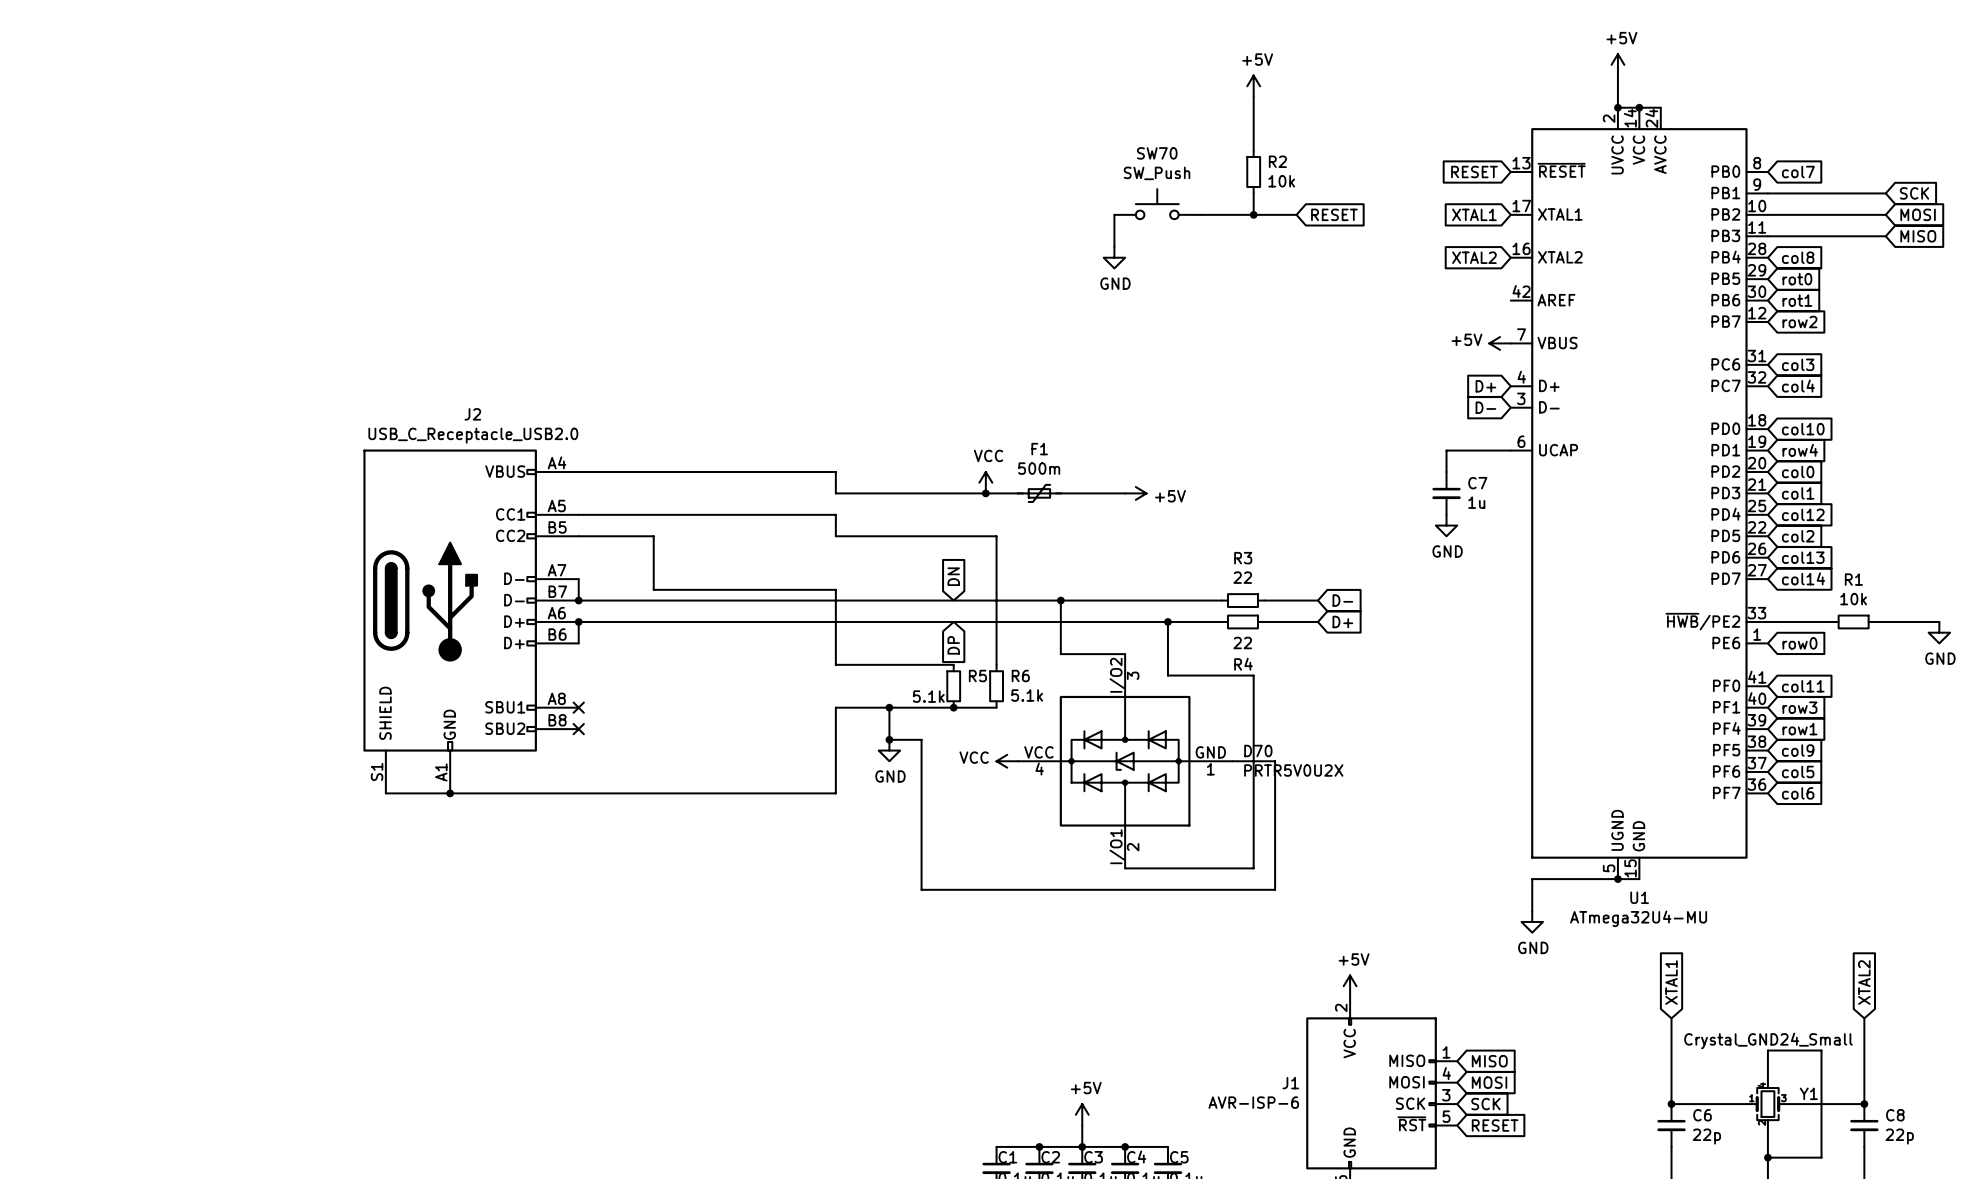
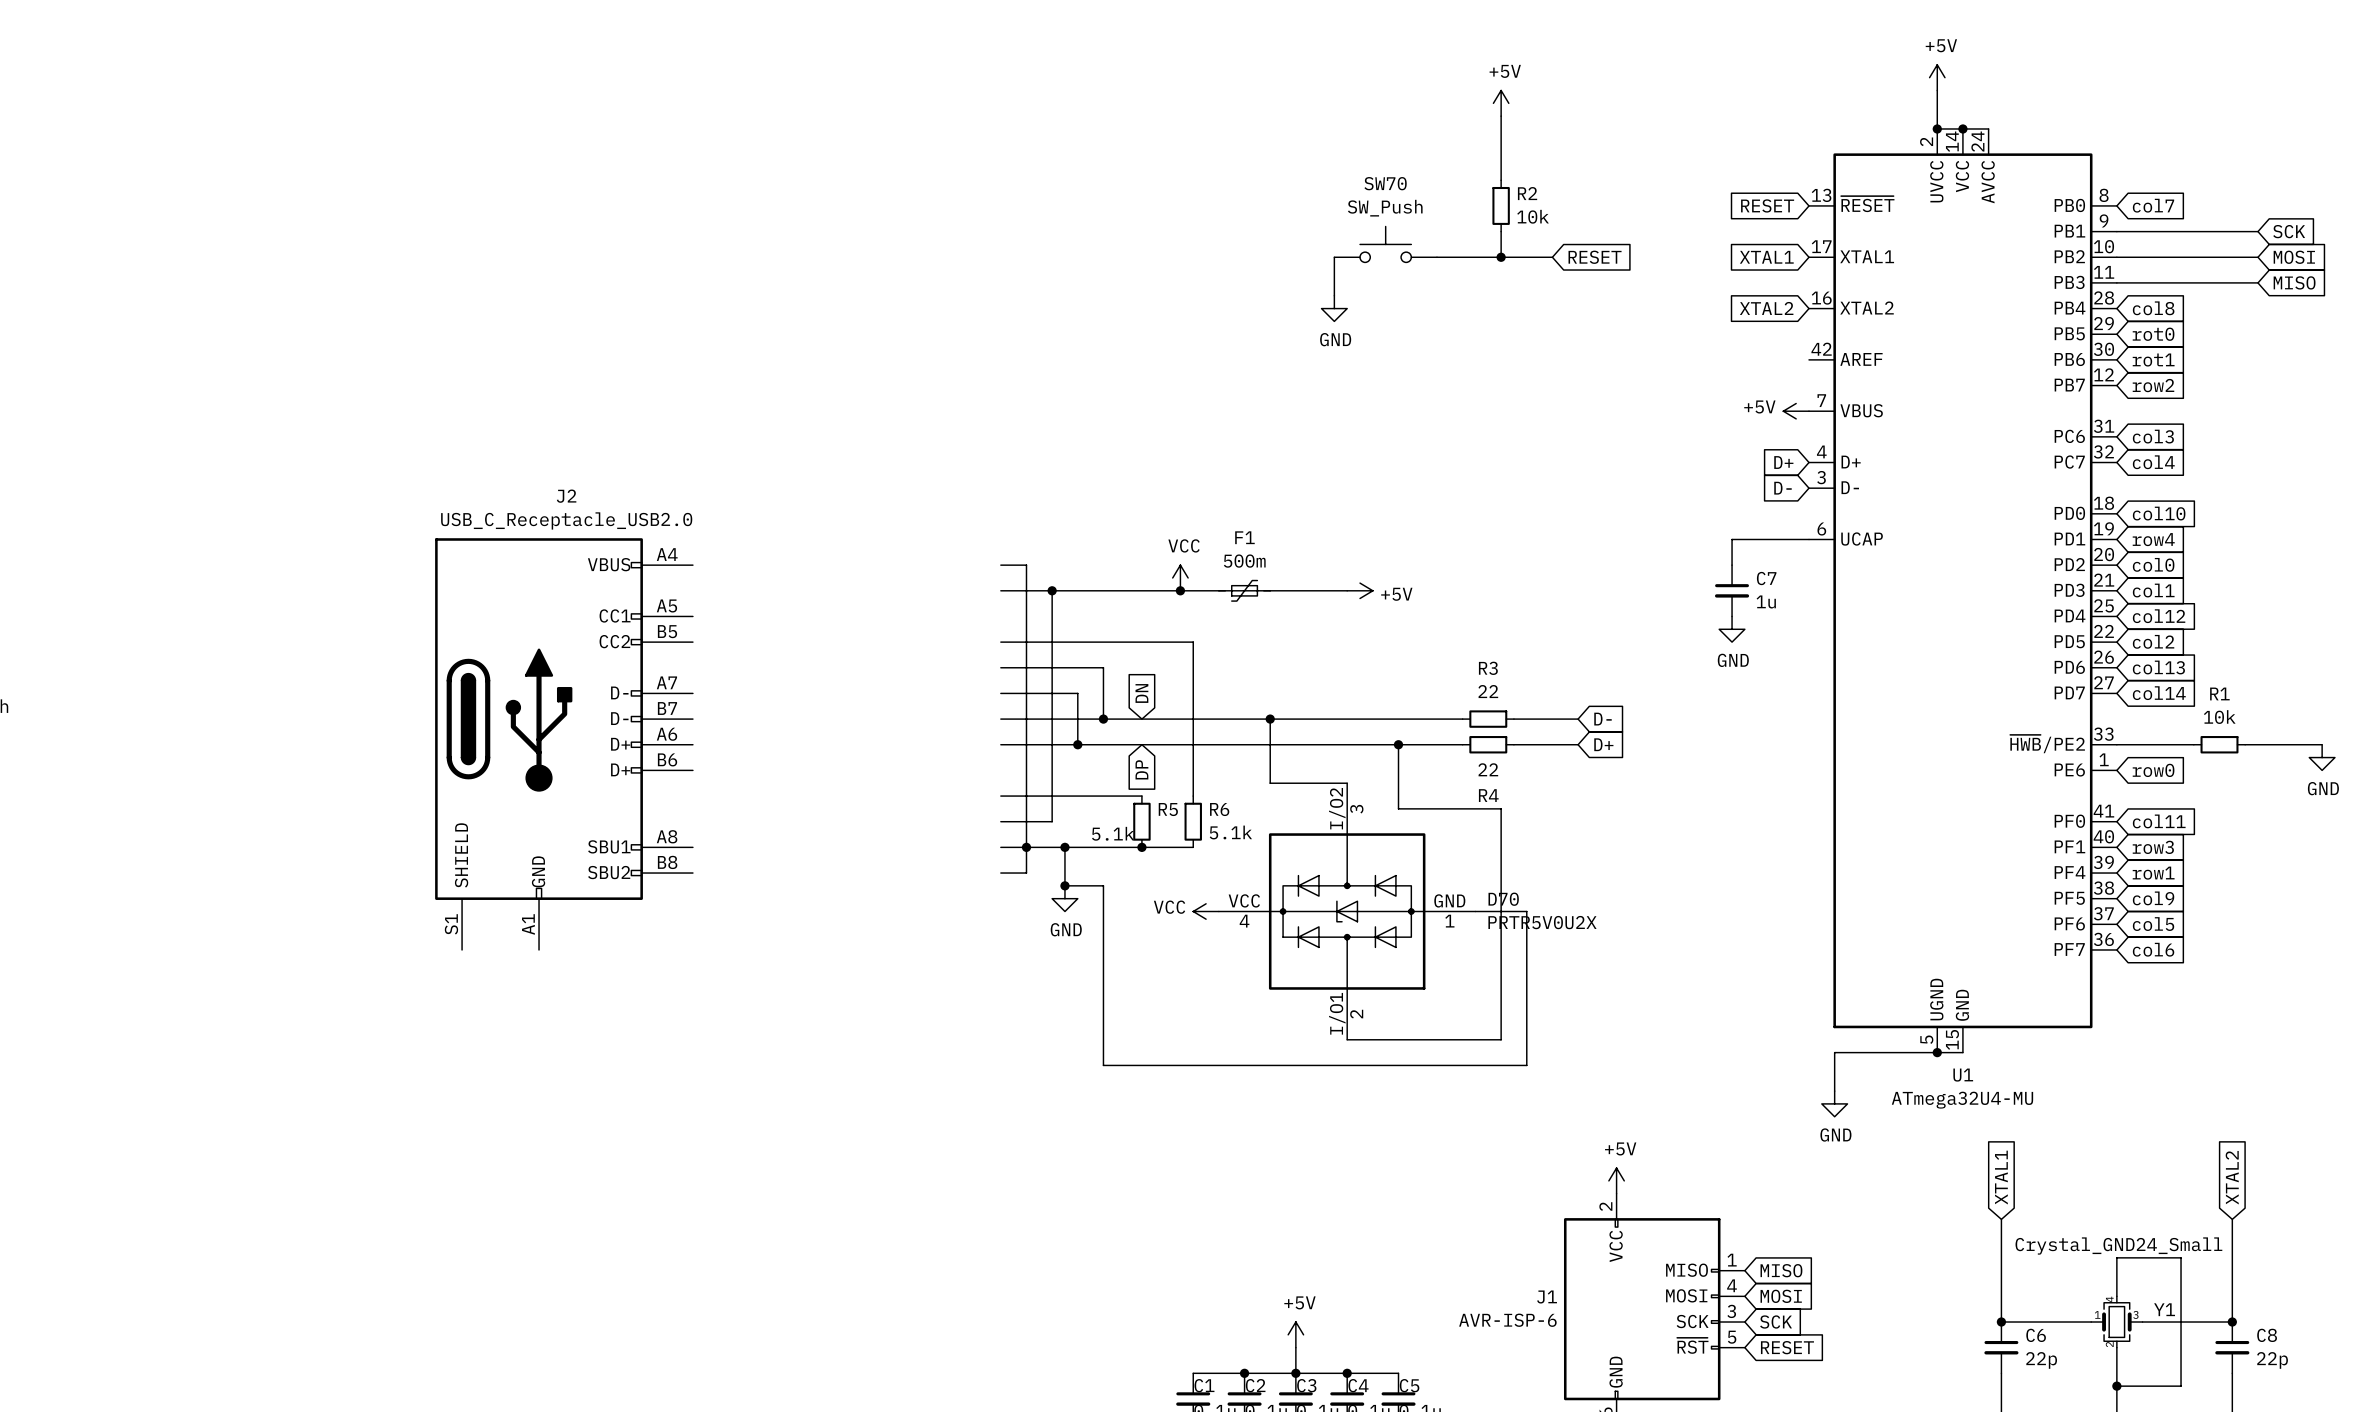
wire: (578, 471) (835, 471) (835, 493) -> none
wire: none -> (1000, 565) (1026, 565) (1026, 873) (1000, 873)
wire: none -> (1052, 590) (1052, 821) (1000, 821)
junction: none -> (1052, 590)
wire: (578, 514) (835, 514) (835, 536) -> none
wire: (578, 536) (653, 536) (653, 589) (835, 589) (835, 664) -> none
wire: none -> (1000, 667) (1103, 667) (1103, 719)
wire: (578, 579) (578, 600) (835, 600) -> none
wire: none -> (1000, 693) (1077, 693) (1077, 744)
junction: (578, 600) -> none
junction: none -> (1103, 719)
junction: (578, 621) -> none
wire: (835, 621) (578, 621) (578, 643) -> none
junction: none -> (1077, 744)
no-connect mark: (578, 707) -> none
wire: (835, 707) (835, 793) (385, 793) -> none
junction: none -> (1026, 847)
no-connect mark: (578, 729) -> none
junction: (450, 793) -> none

